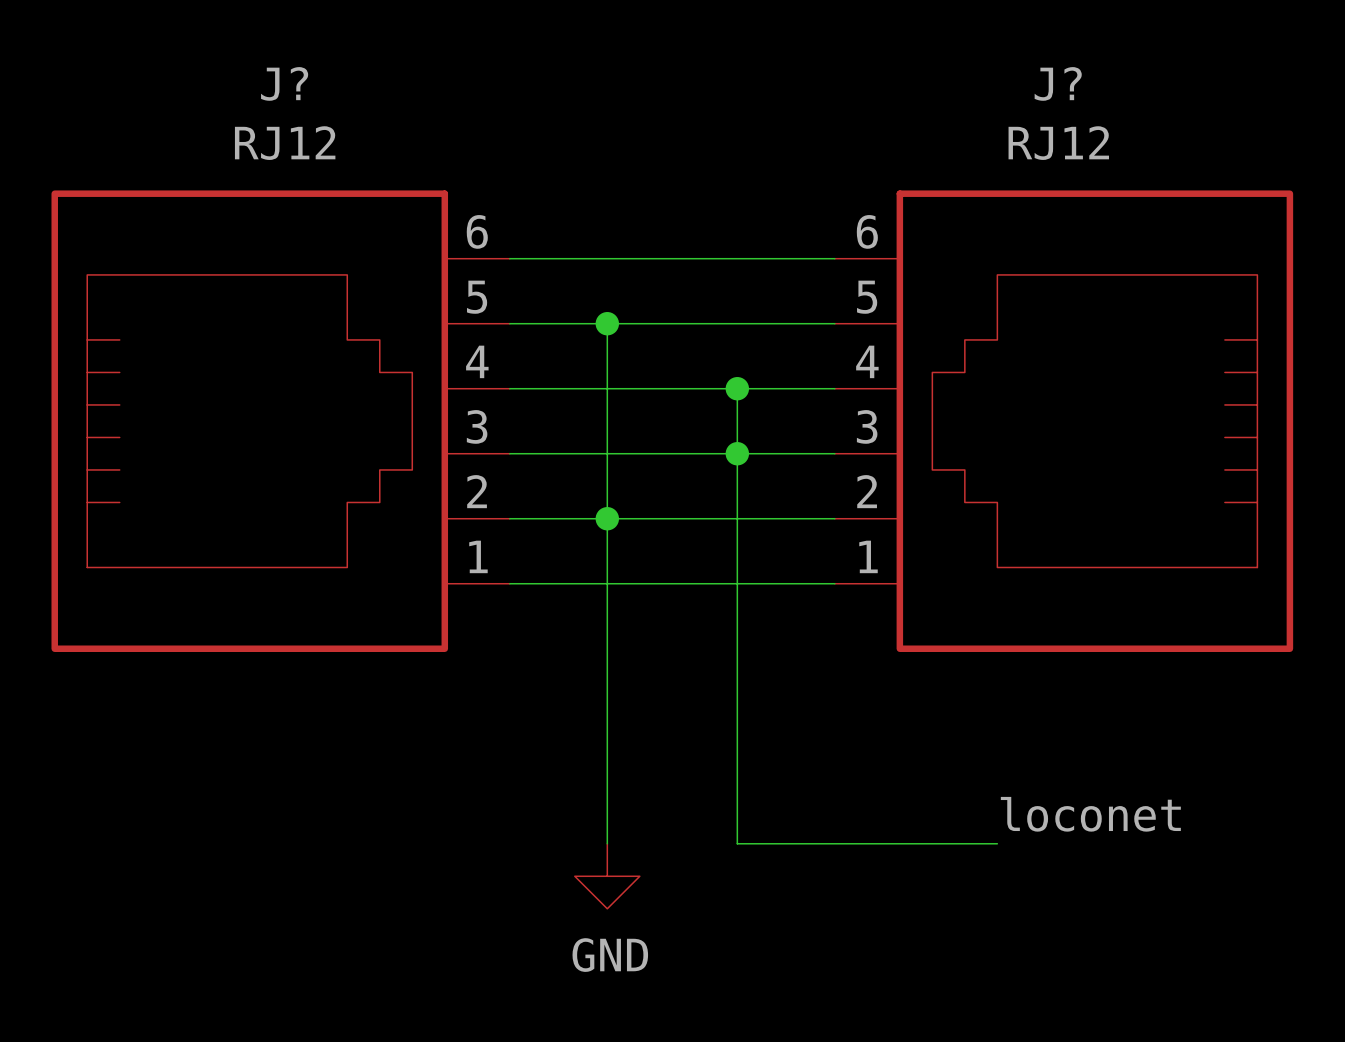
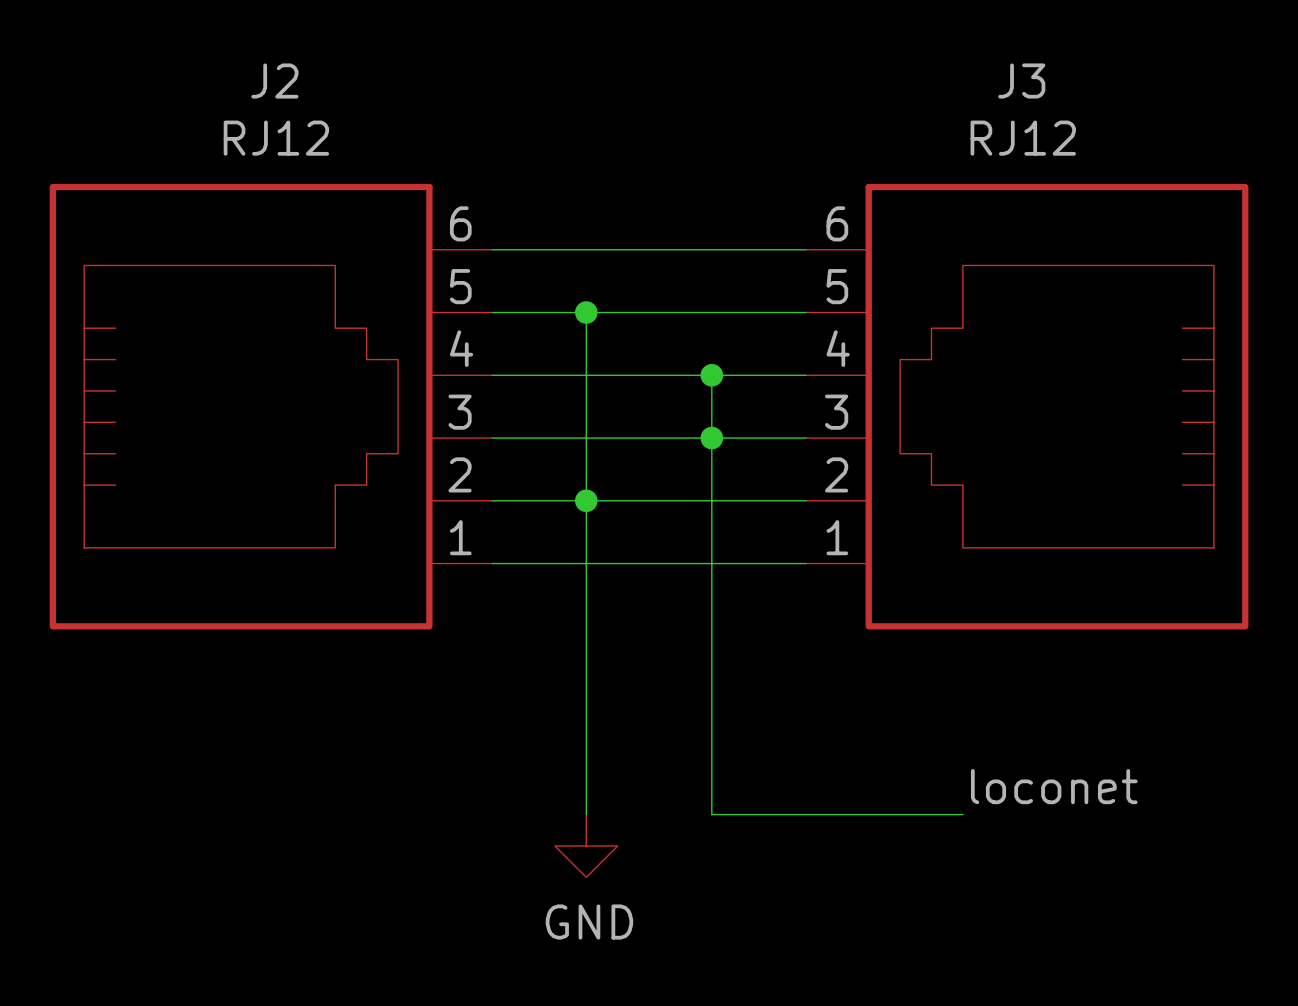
J? name: J? (284, 83) -> J2 (274, 81)
J? name: J? (1058, 83) -> J3 (1021, 81)

